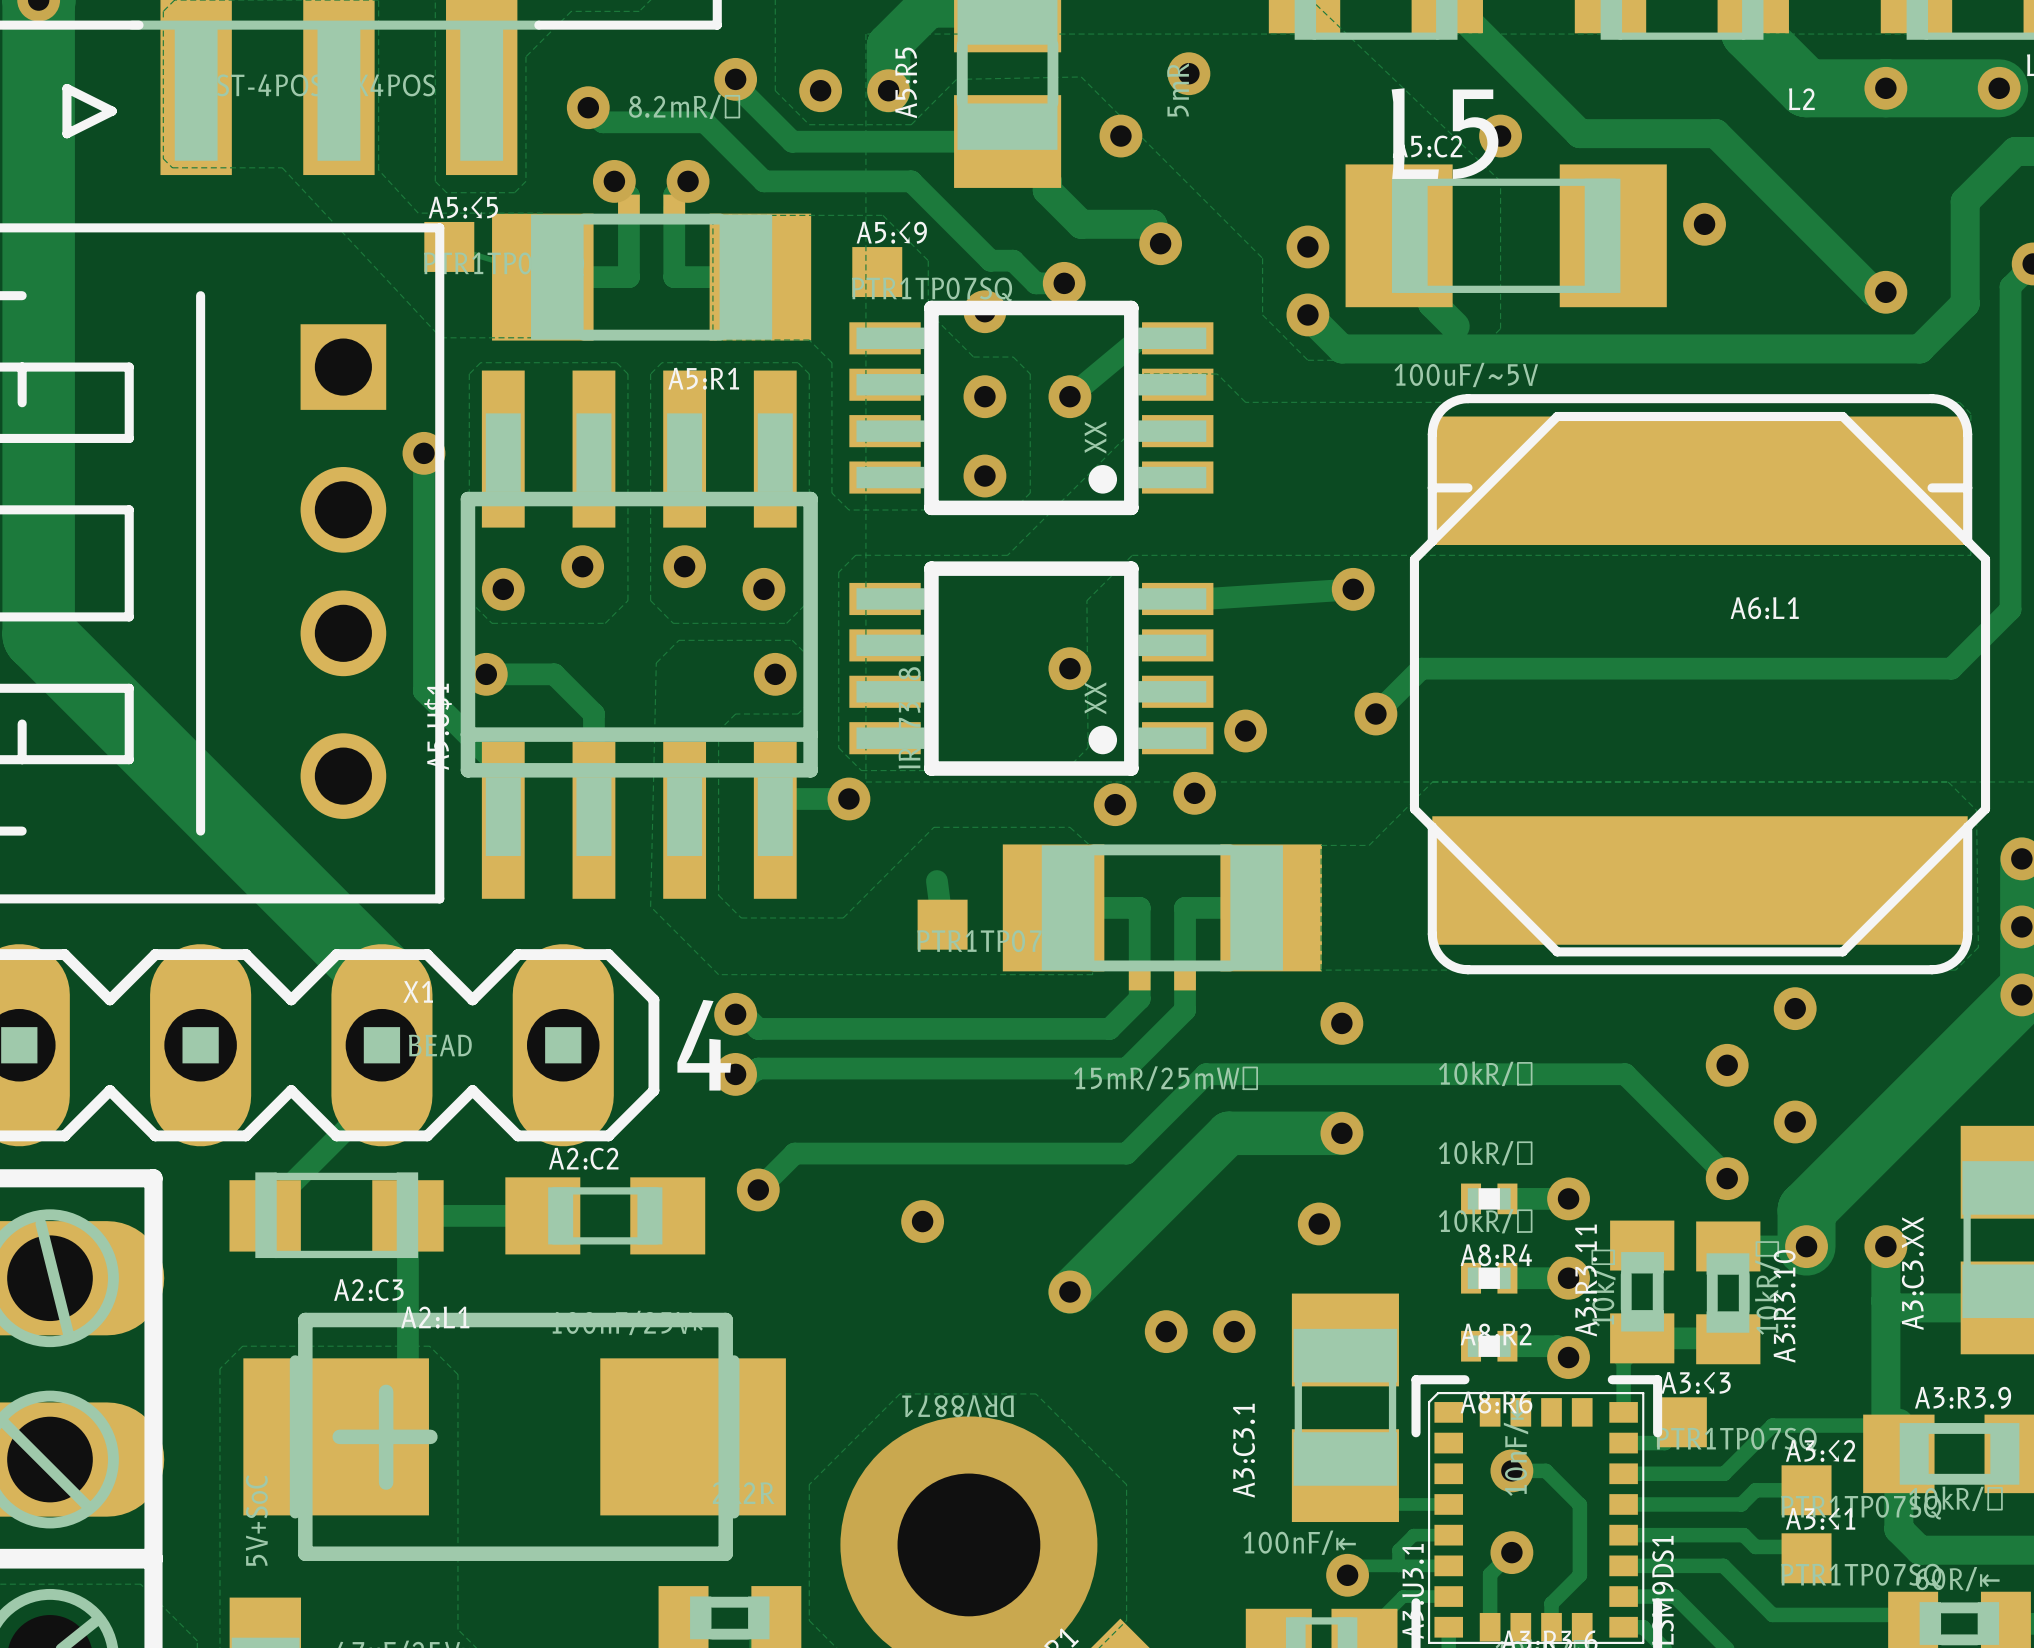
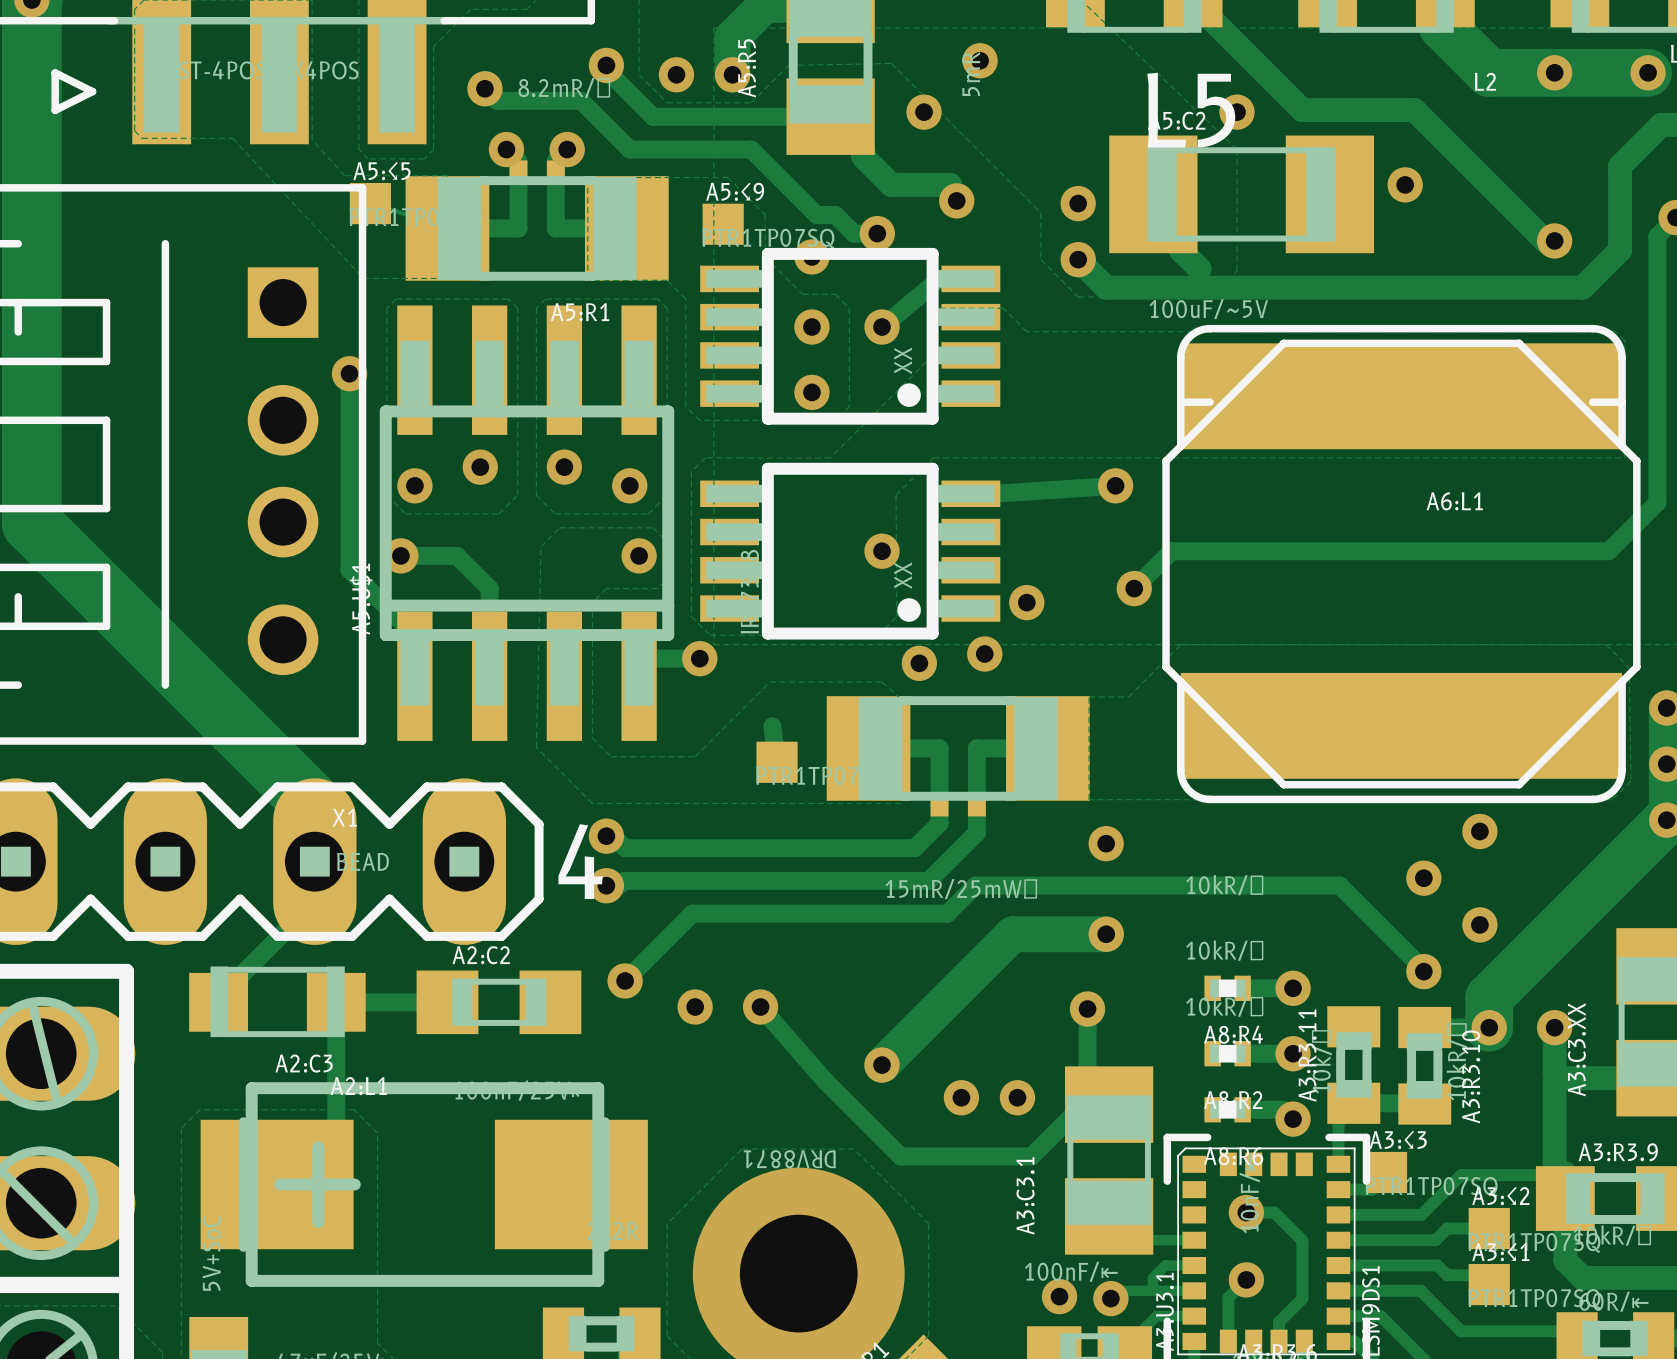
track: (1205, 1074) (1126, 1153) (794, 1153) -> (994, 885) (975, 885) (947, 913) (692, 913) (655, 950)
via: none -> (695, 1007)
track: none -> (760, 1007) (825, 1081) (900, 1156) (1031, 1156) (1087, 1100) (1087, 1009)
via: none -> (1059, 1296)

